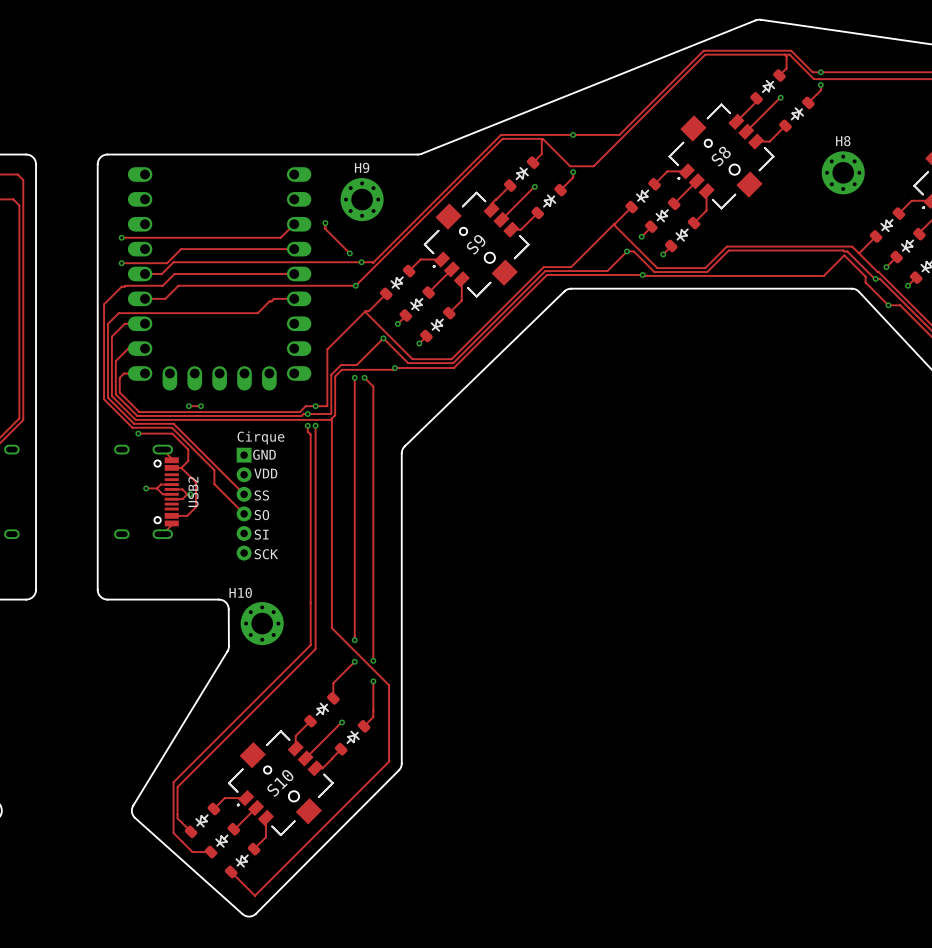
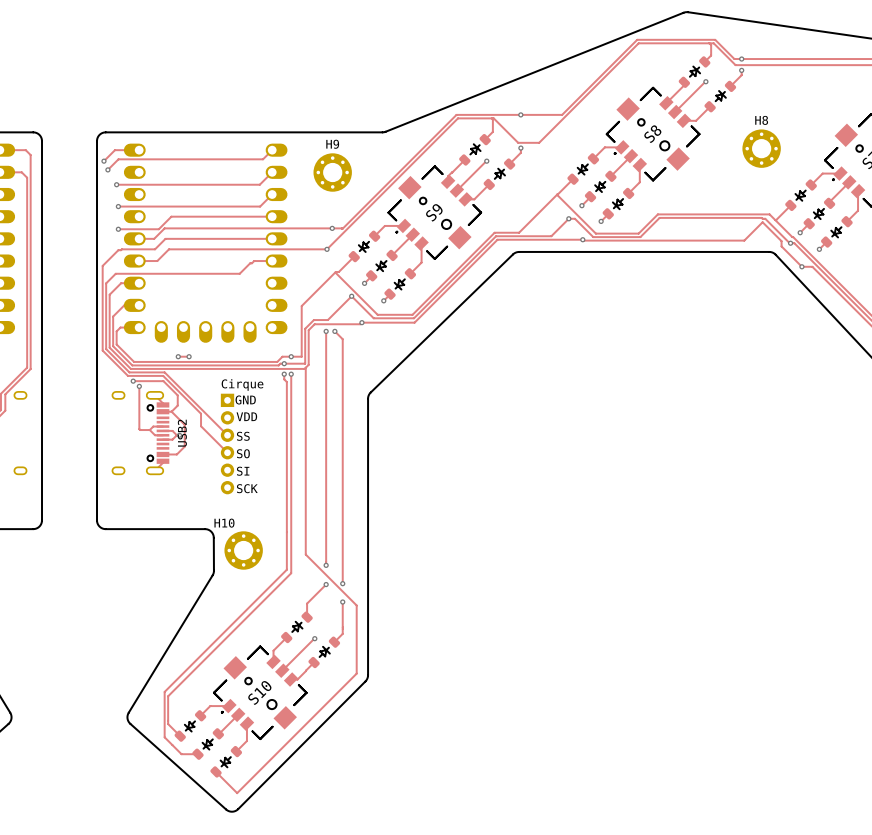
track: none -> (139, 150) (114, 150) (103, 161)
track: none -> (272, 150) (263, 159) (118, 159) (107, 169)
via: none -> (103, 161)
via: none -> (107, 169)
track: none -> (272, 172) (259, 184) (116, 184)
via: none -> (116, 184)
track: (325, 223) (325, 228) (349, 253) -> none
via: (325, 223) -> none
via: (349, 253) -> none
track: none -> (139, 386) (140, 430)
via position: (146, 488) -> (139, 386)

